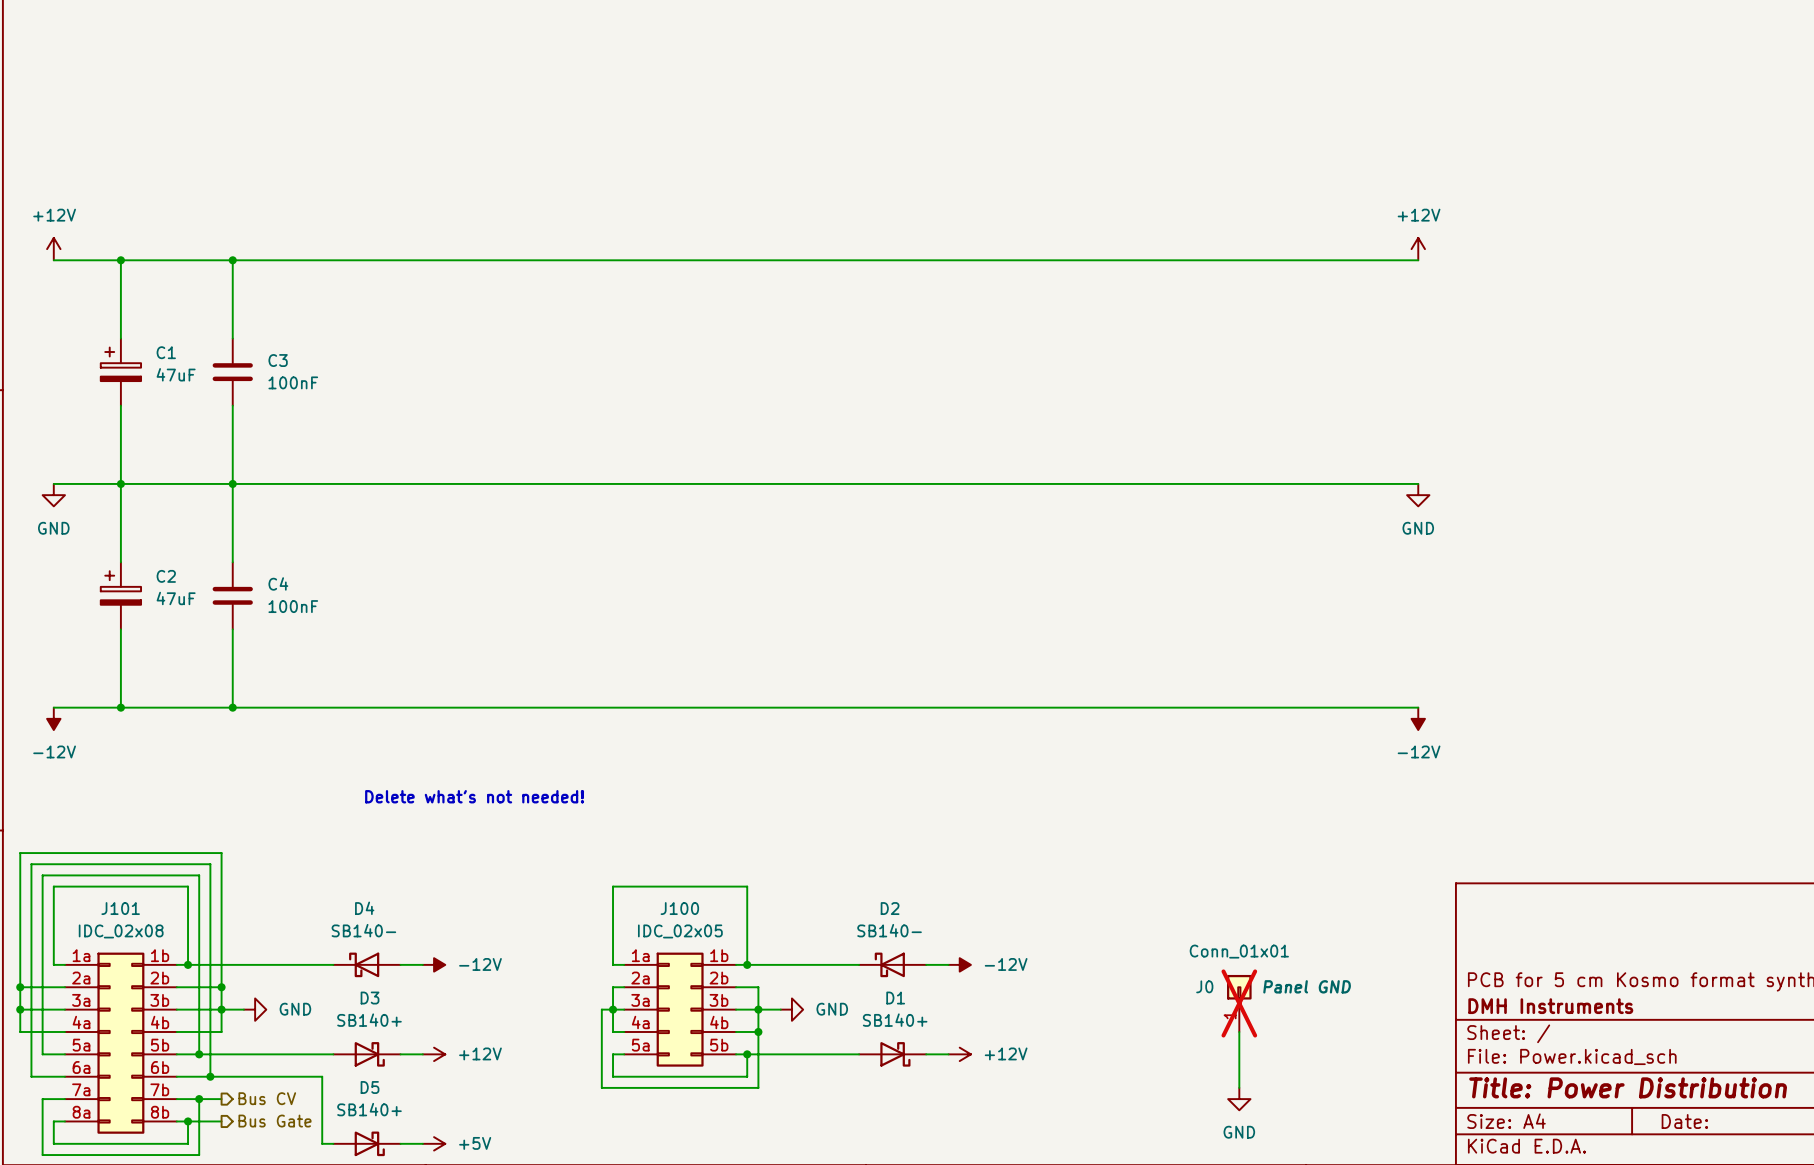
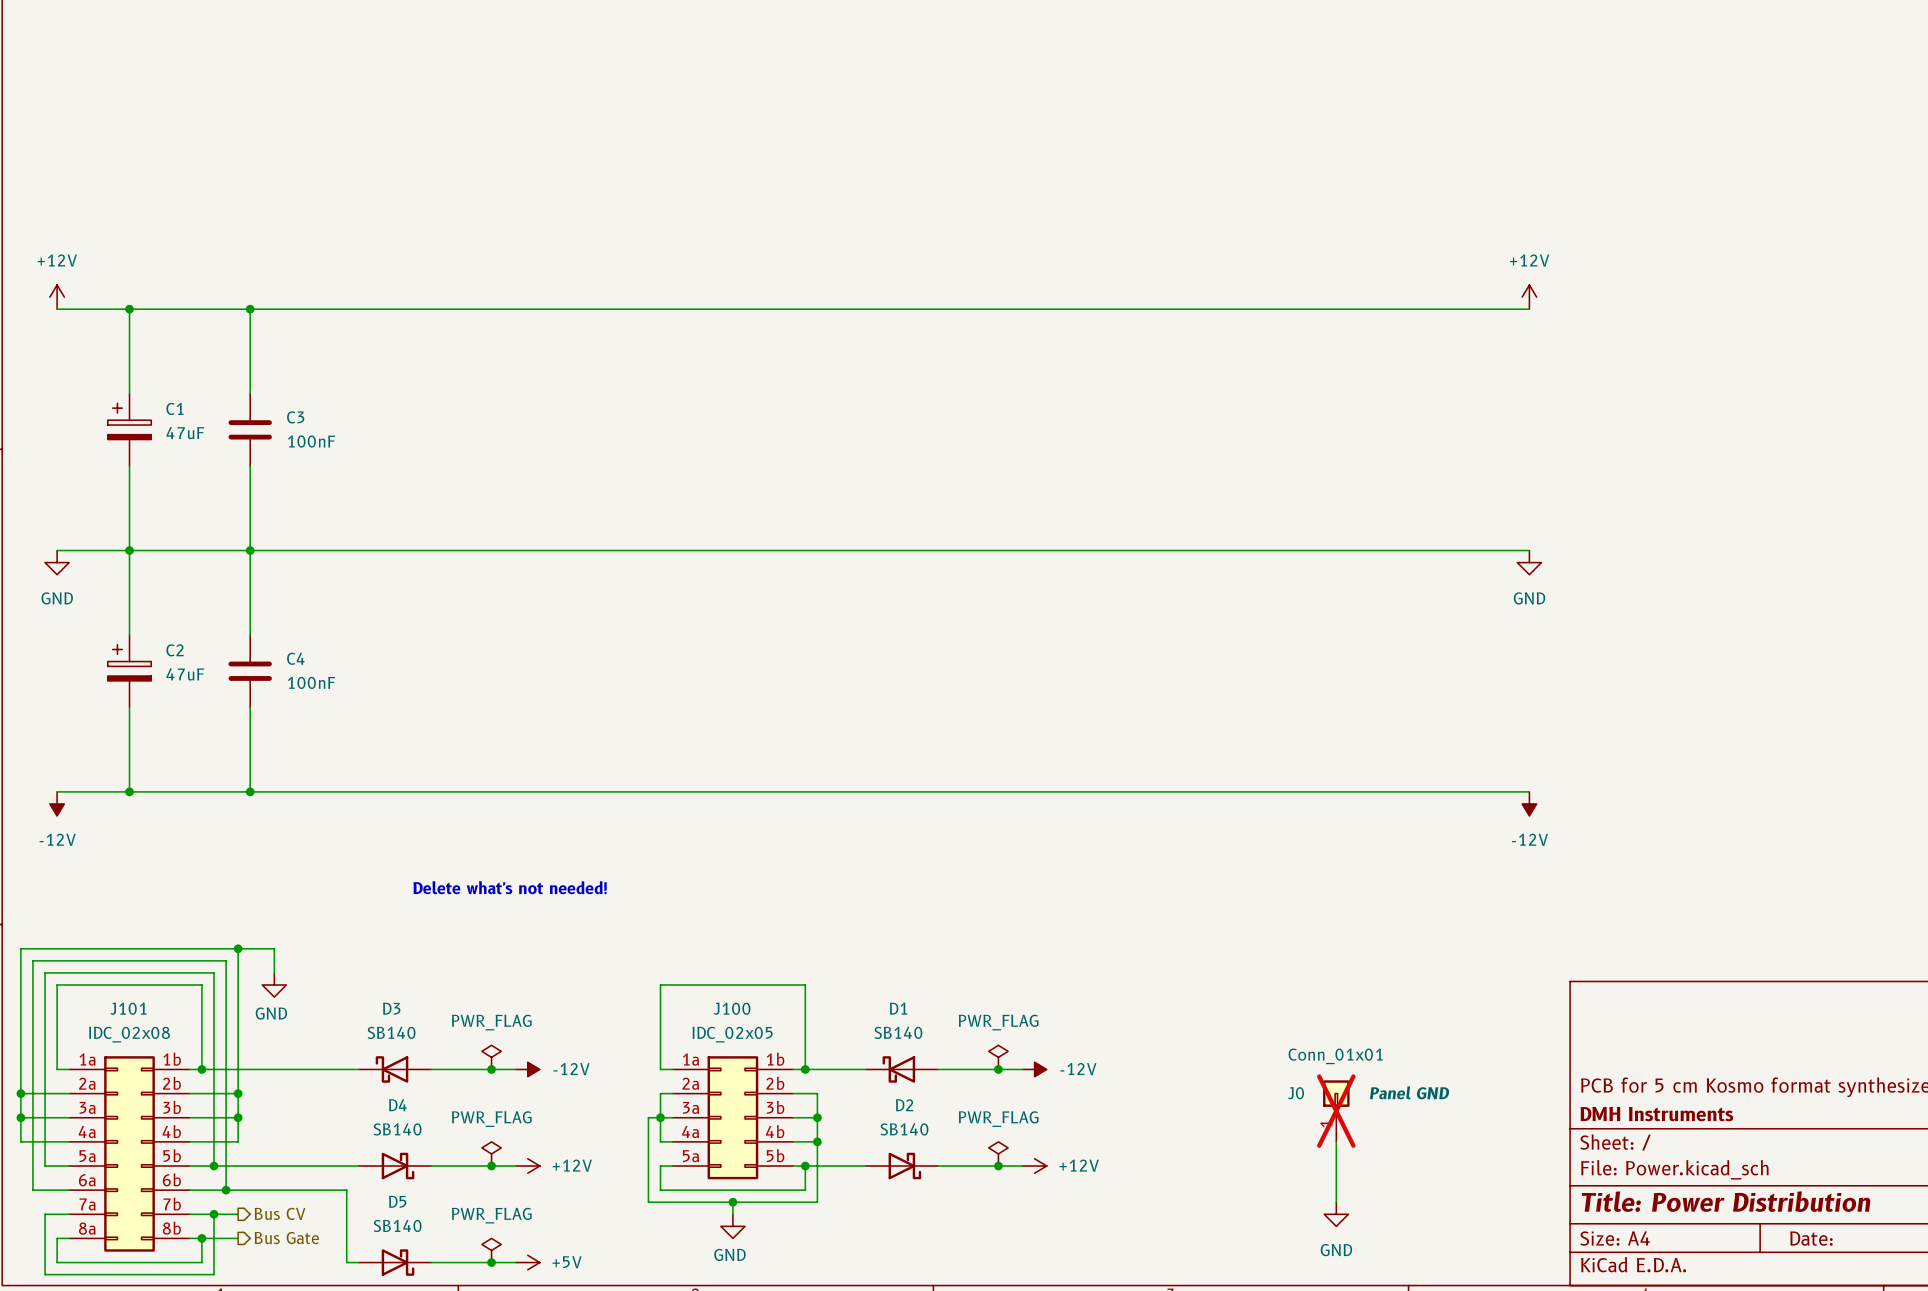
wire: none -> (238, 948) (274, 948) (274, 972)
junction: none -> (238, 948)
D4 name: D4 (364, 908) -> D3 (391, 1008)
D4 value: SB140- (363, 930) -> SB140 (391, 1032)
D2 value: SB140- (889, 930) -> SB140 (904, 1129)
power symbol: none -> PWR_FLAG (491, 1057)
power symbol: none -> PWR_FLAG (998, 1057)
wire: none -> (455, 1069) (515, 1069)
power symbol position: -12V (434, 964) -> -12V (527, 1069)
junction: none -> (491, 1069)
D2 rotation: 0° (889, 964) -> 180° (904, 1166)
D2 position: (892, 964) -> (901, 1166)
junction: none -> (998, 1069)
D3 name: D3 (370, 998) -> D4 (397, 1105)
wire: (221, 1009) (243, 1009) -> none
power symbol rotation: 0° (255, 1009) -> 90° clockwise (274, 984)
power symbol position: GND (255, 1009) -> GND (274, 984)
wire: (758, 1009) (780, 1009) -> none
power symbol rotation: 0° (791, 1009) -> 90° clockwise (732, 1226)
power symbol position: GND (791, 1009) -> GND (732, 1226)
D3 value: SB140+ (369, 1020) -> SB140 (397, 1129)
D1 value: SB140+ (895, 1020) -> SB140 (898, 1032)
power symbol: none -> PWR_FLAG (491, 1153)
power symbol: none -> PWR_FLAG (998, 1153)
wire: none -> (455, 1166) (515, 1166)
power symbol position: +12V (434, 1054) -> +12V (527, 1166)
junction: none -> (491, 1166)
D1 position: (892, 1054) -> (901, 1069)
D1 rotation: 0° (895, 1054) -> 180° (898, 1069)
junction: none -> (998, 1166)
wire: none -> (732, 1202) (732, 1214)
junction: none -> (732, 1202)
D5 value: SB140+ (369, 1109) -> SB140 (397, 1225)
power symbol: none -> PWR_FLAG (491, 1250)
wire: none -> (455, 1262) (515, 1262)
power symbol position: +5V (434, 1143) -> +5V (527, 1262)
junction: none -> (491, 1262)

